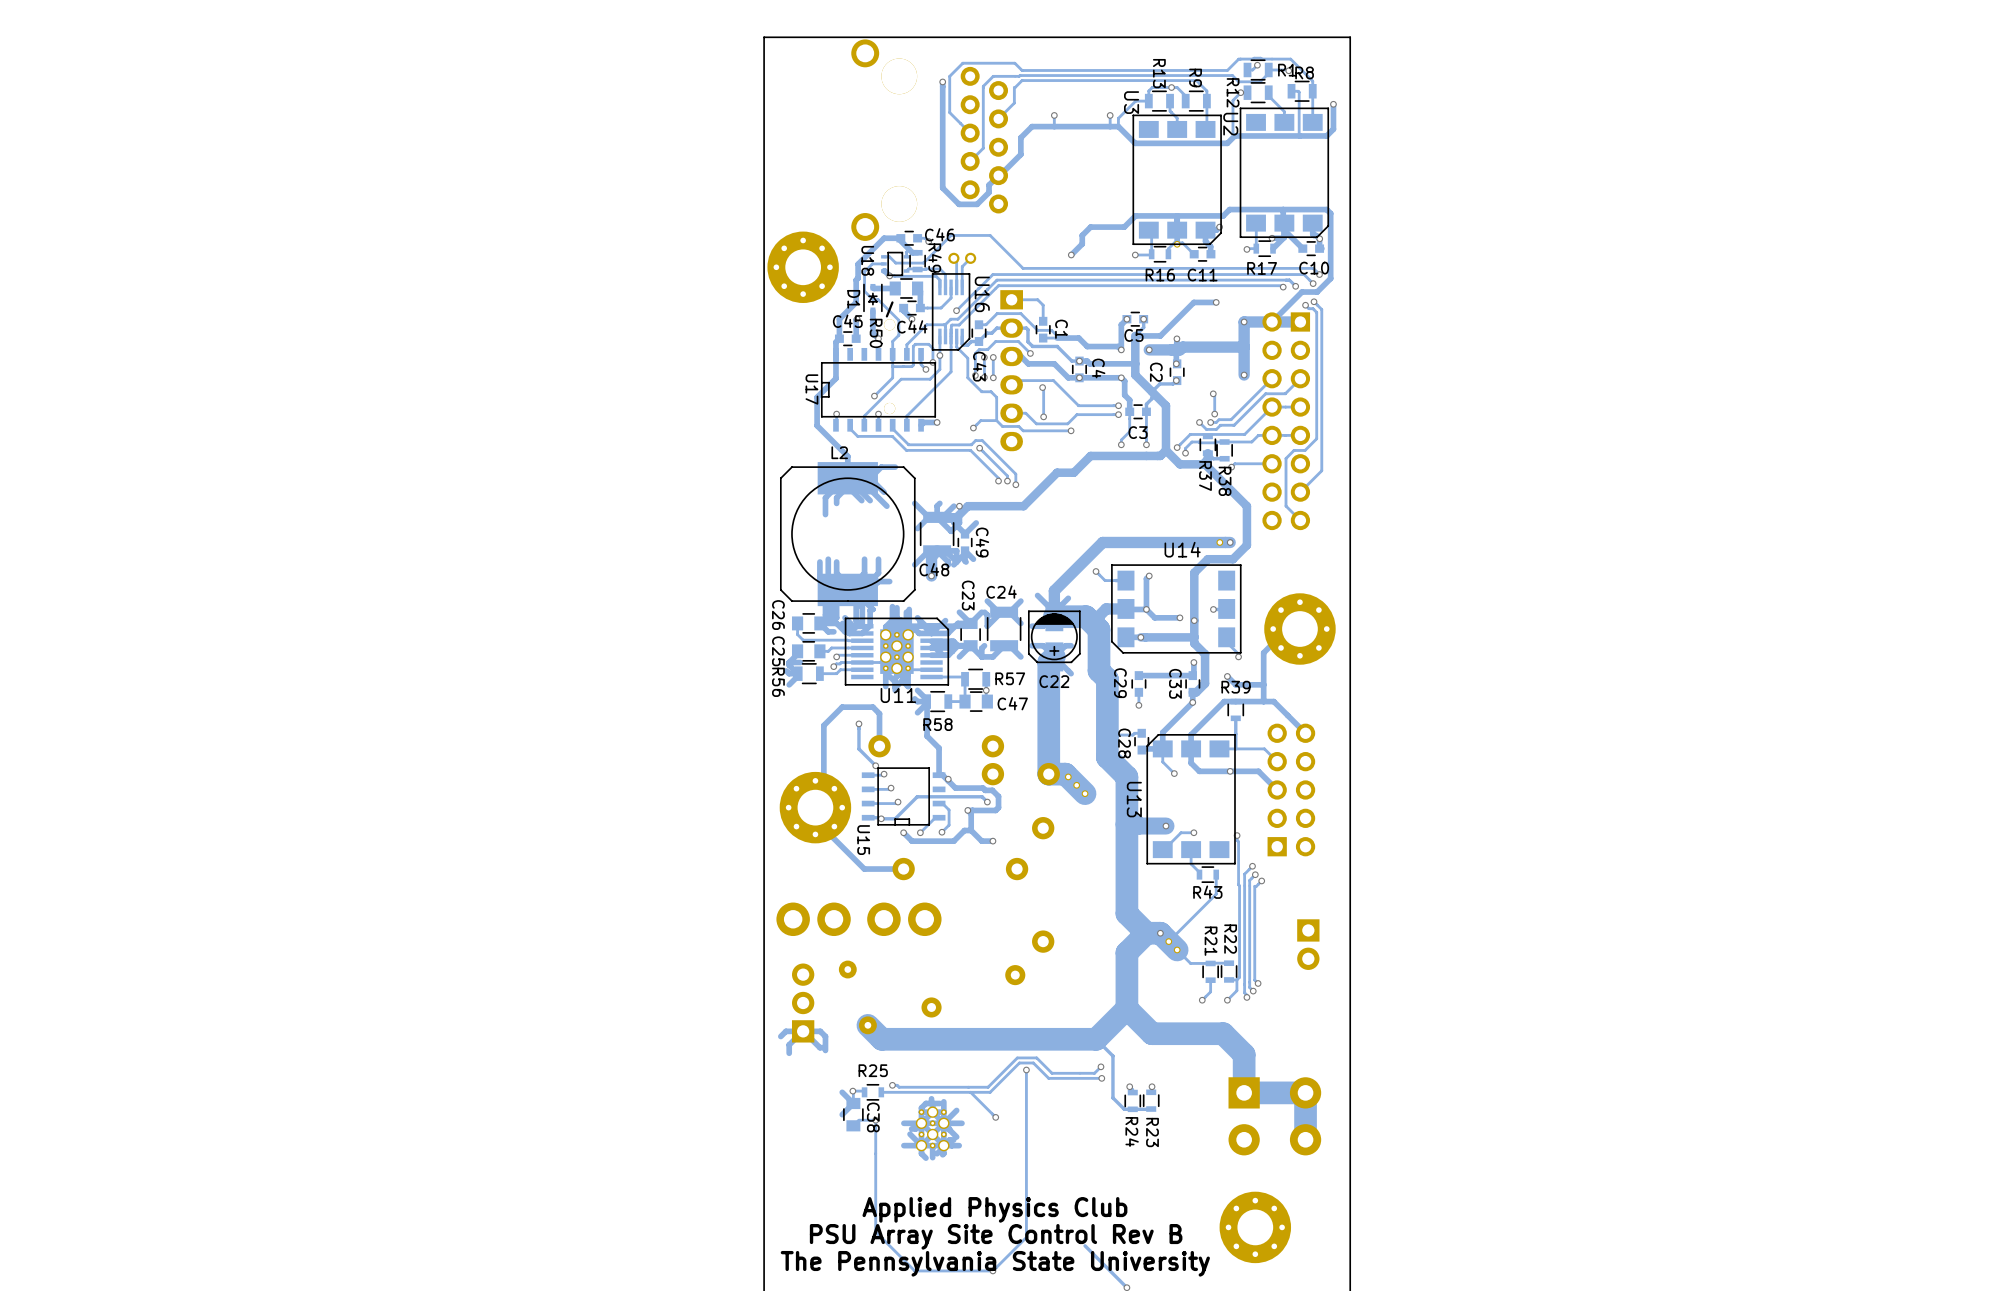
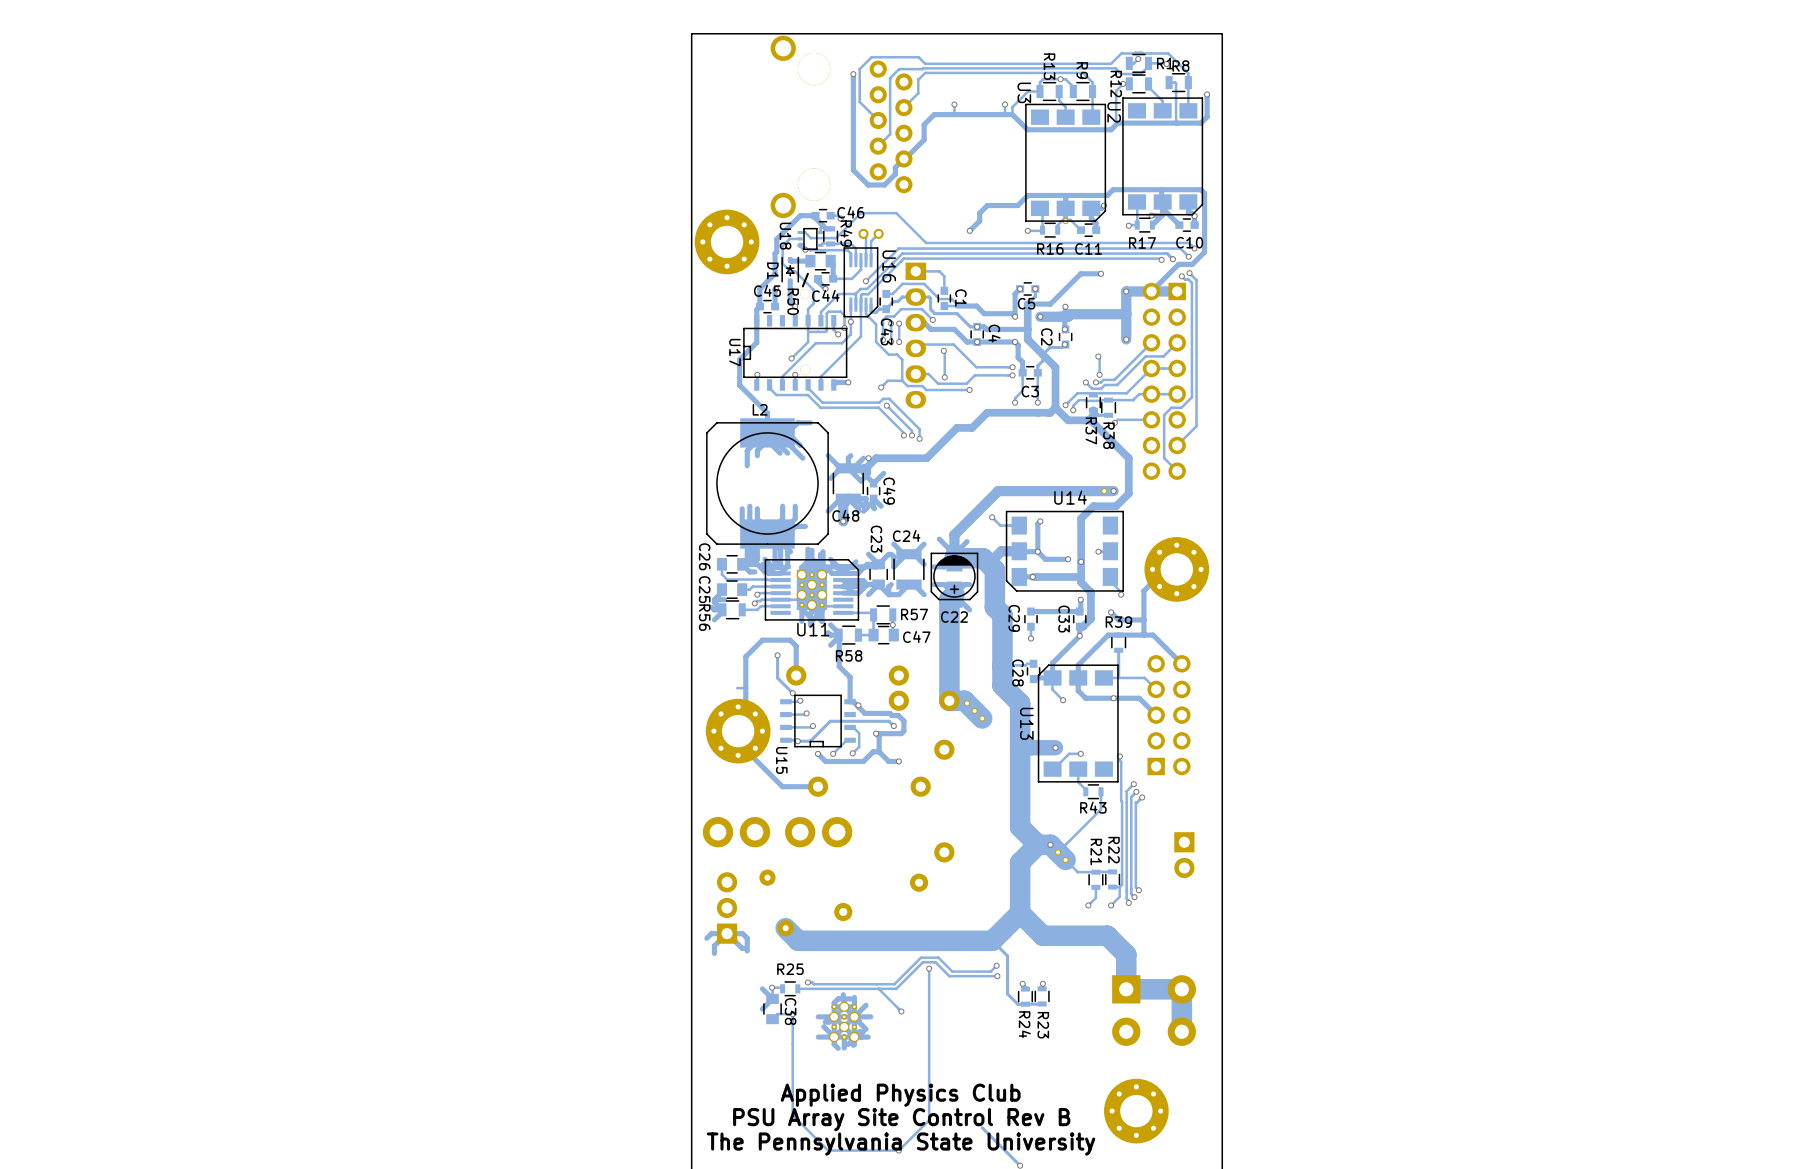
track: none -> (745, 688) (737, 688)

